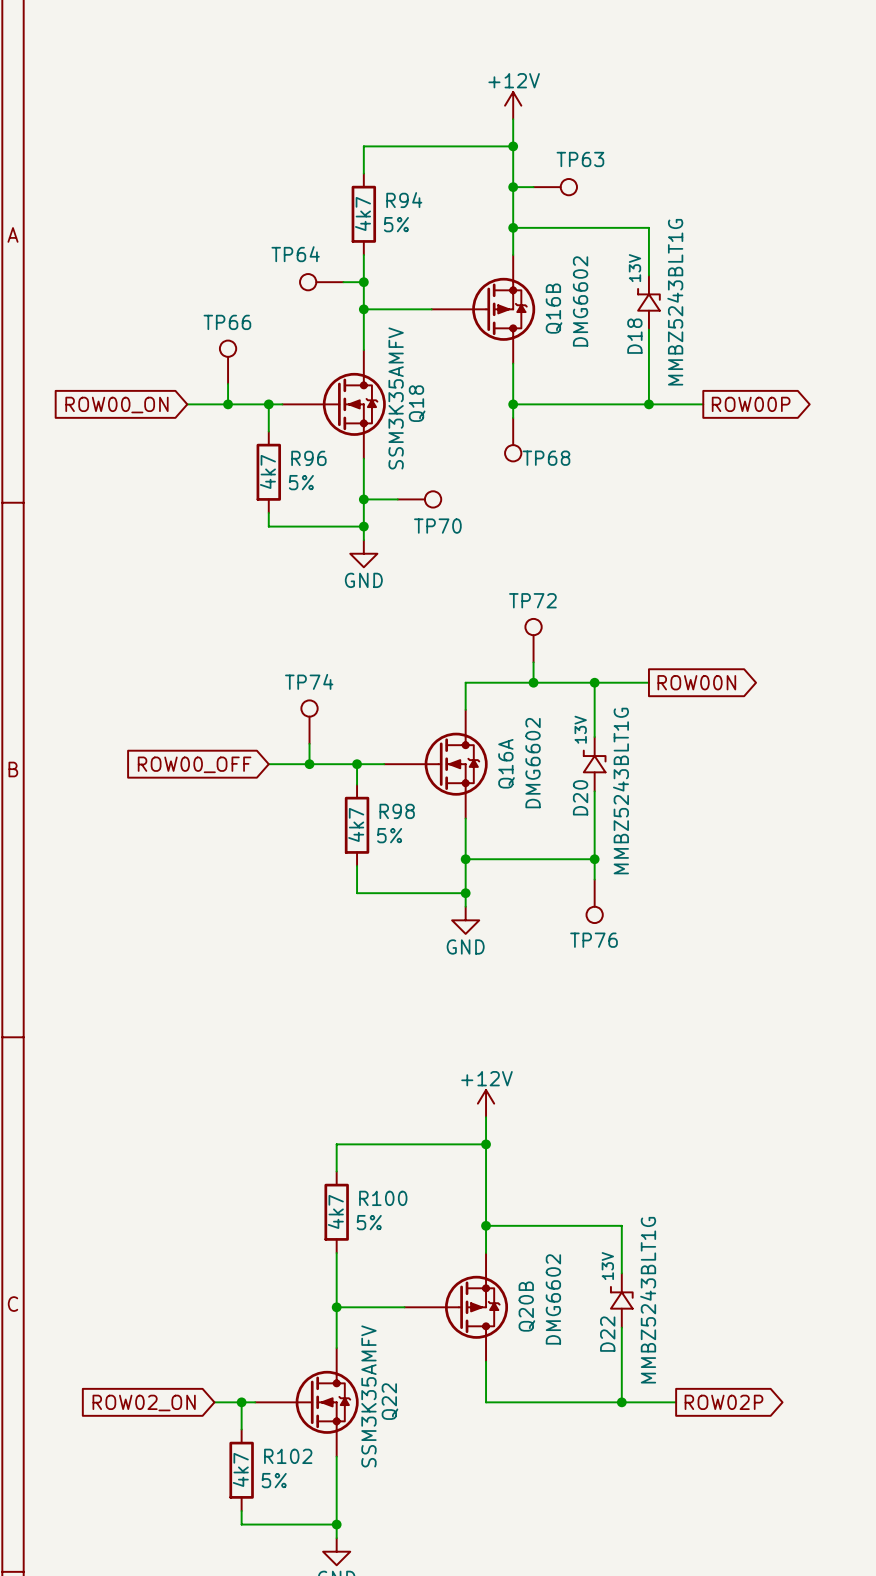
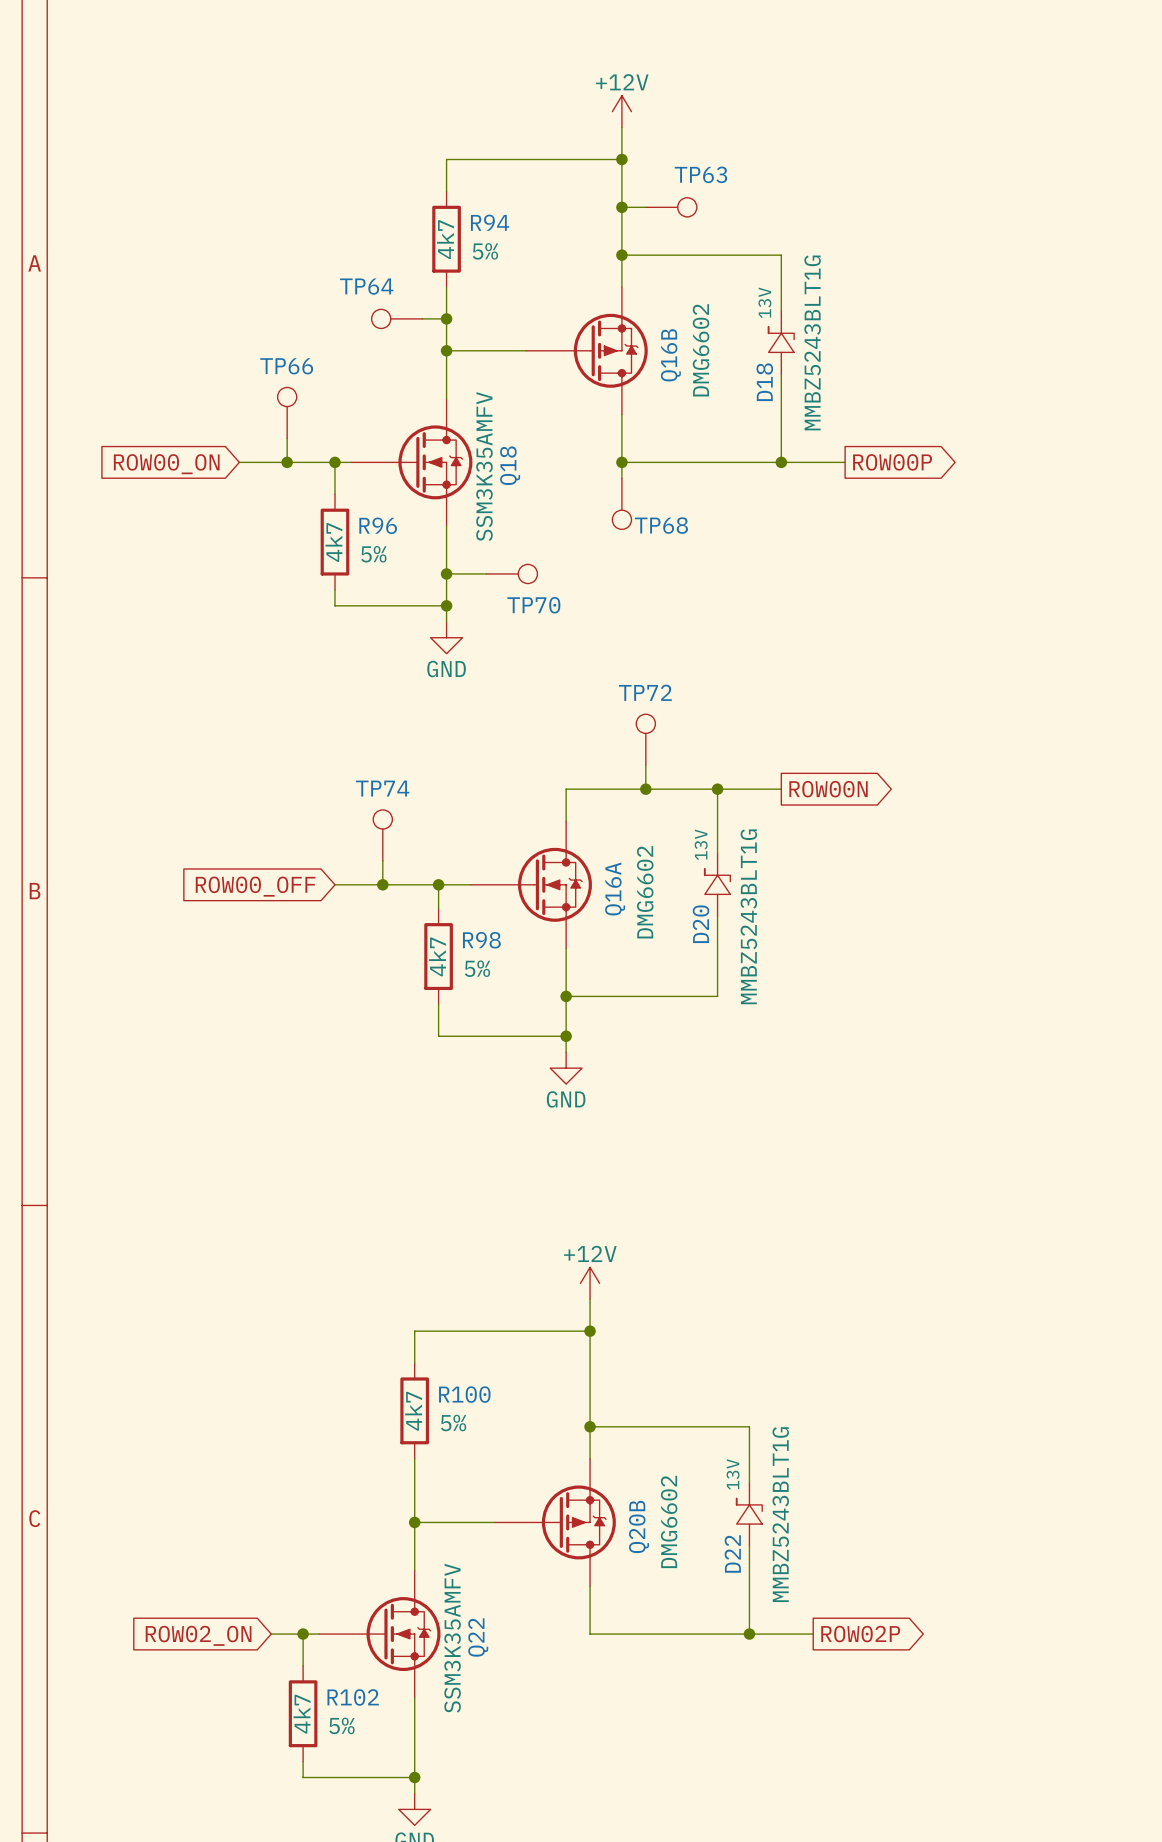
wire: (594, 859) (594, 879) -> none
junction: (594, 859) -> none
TP76: (594, 901) -> none

